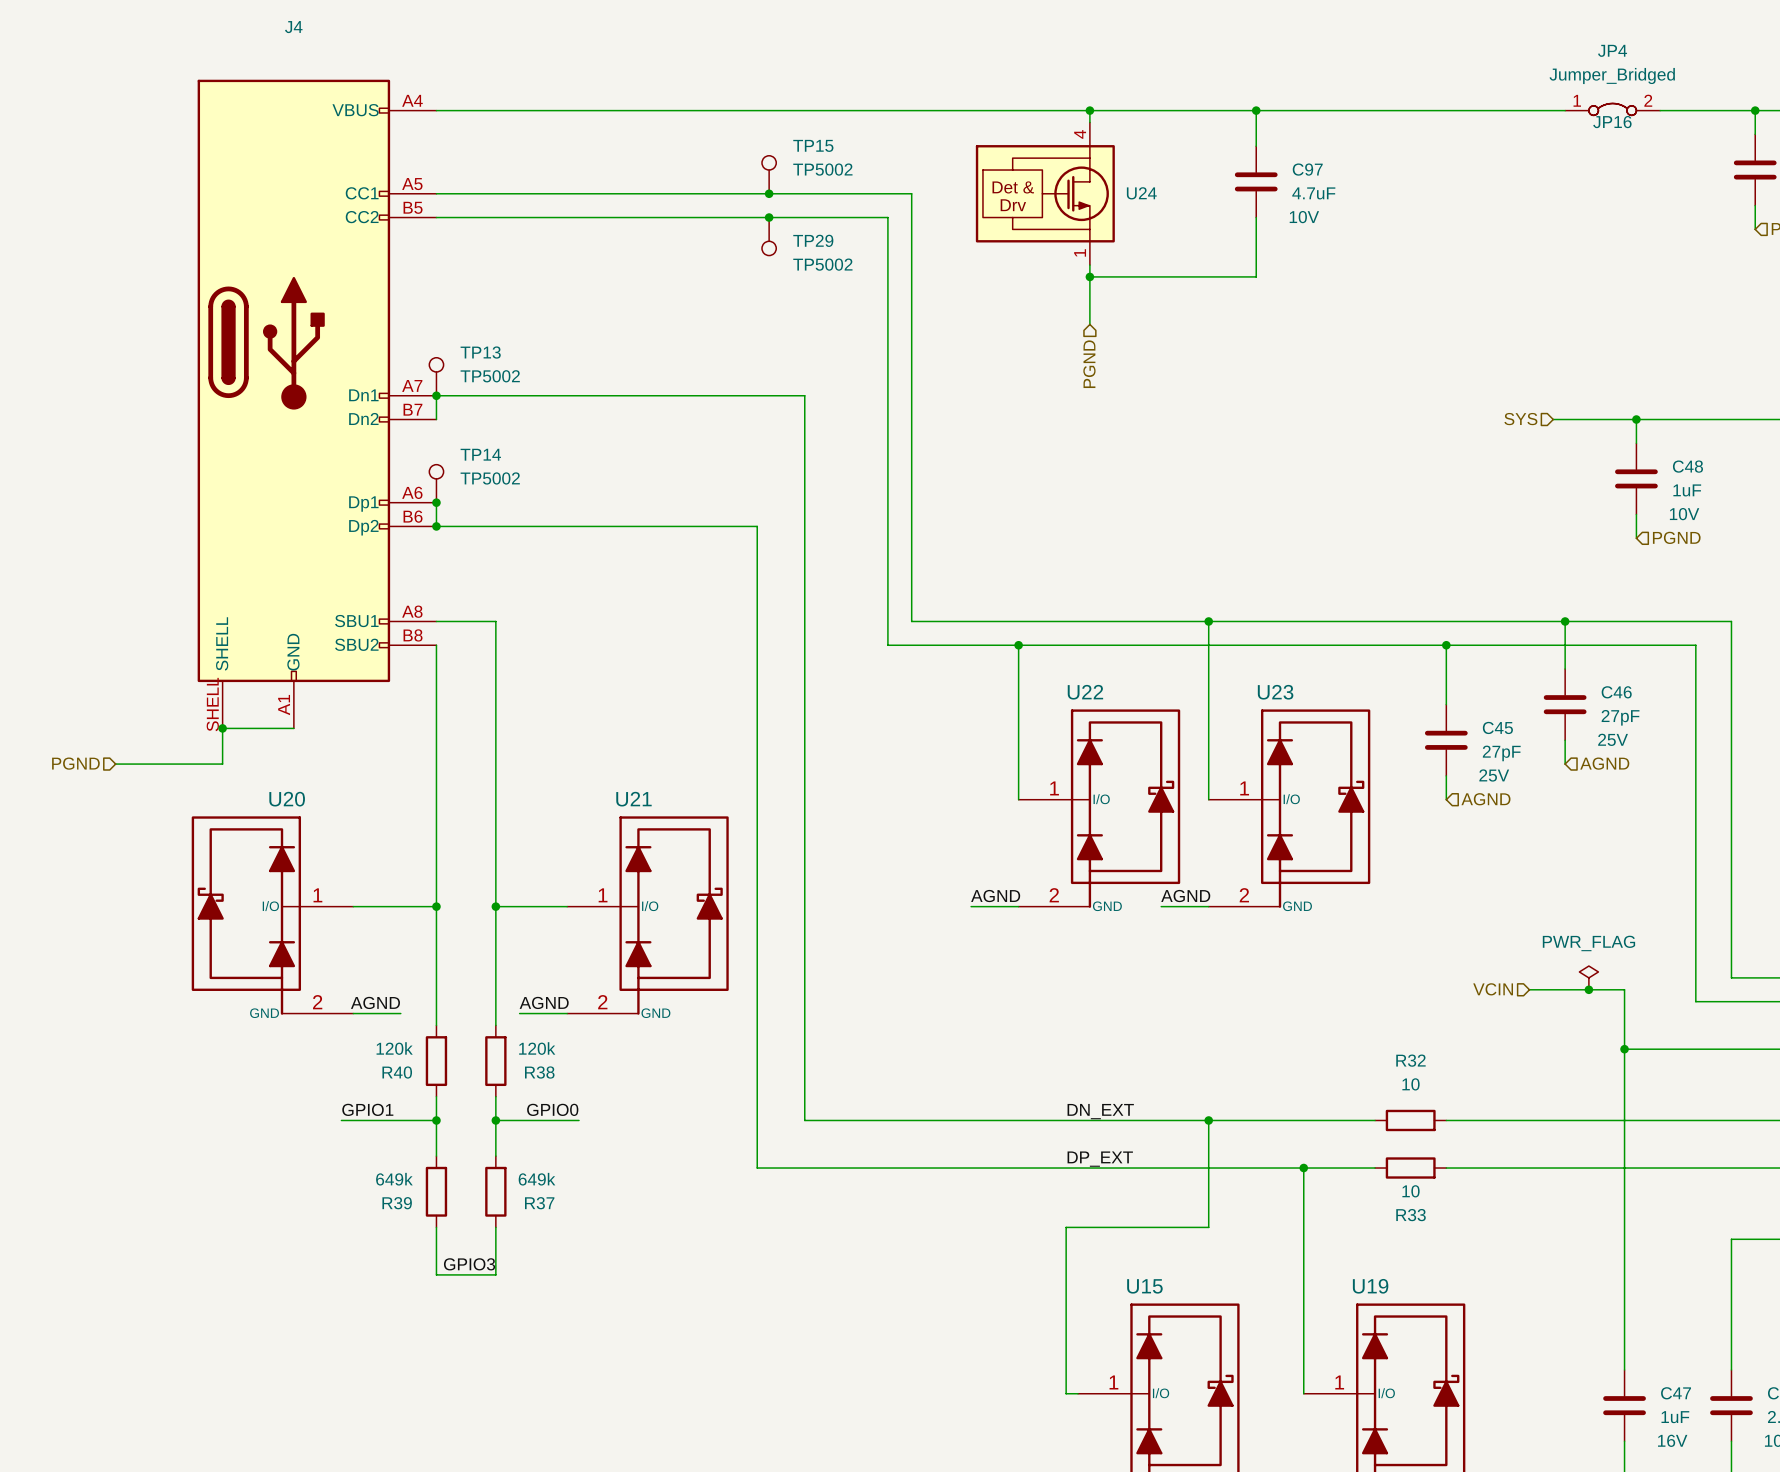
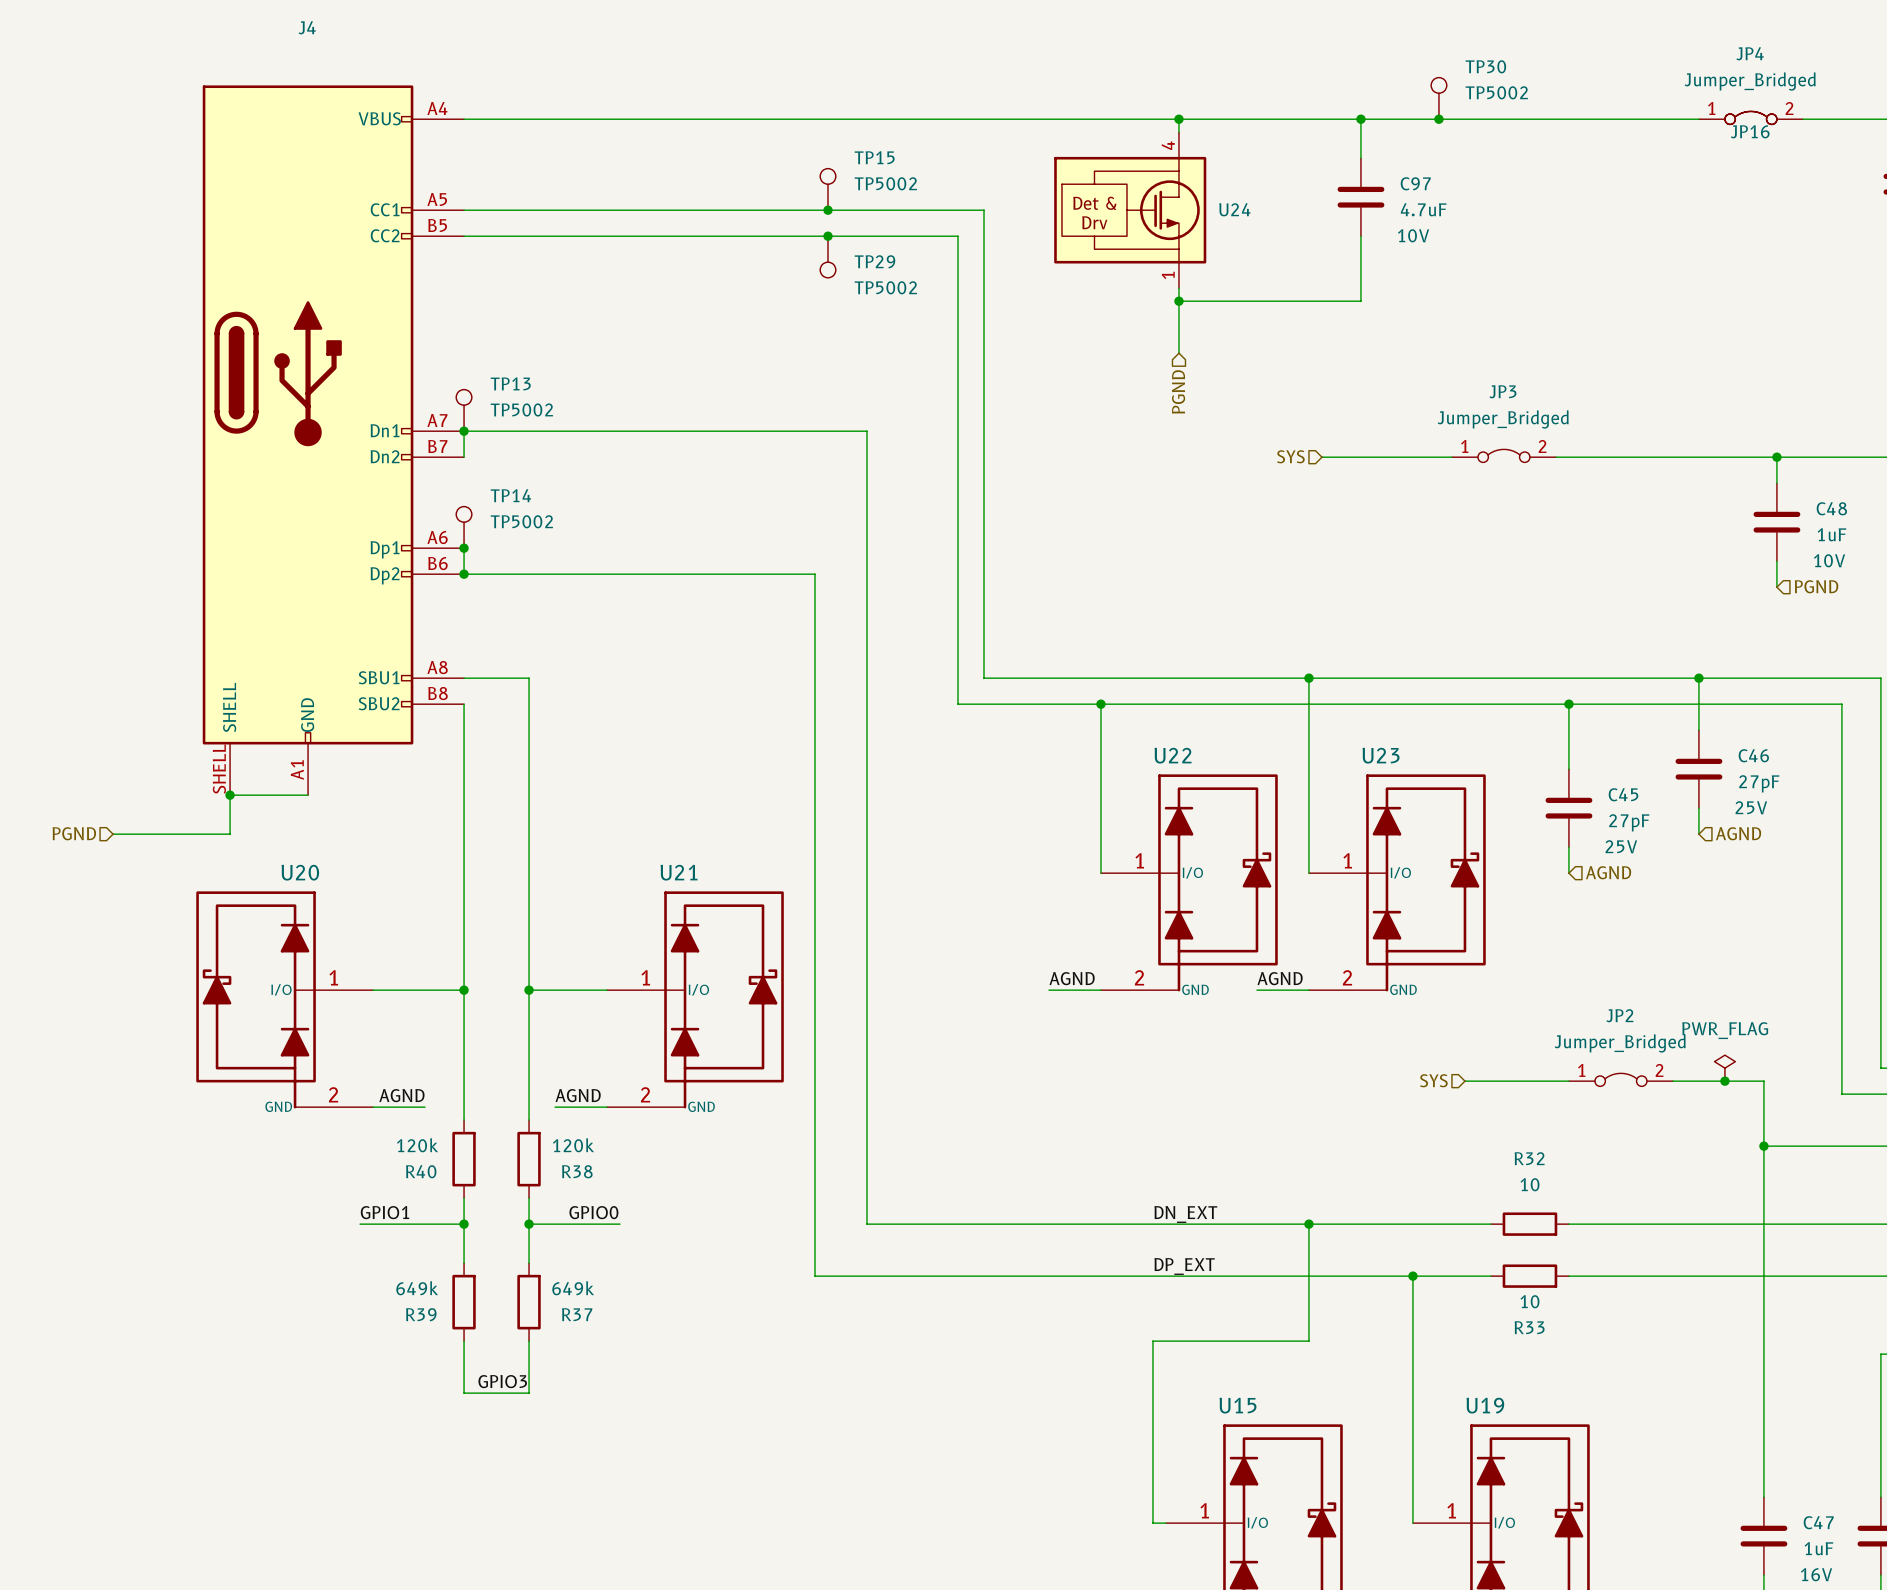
TP30: none -> TP5002 (1438, 98)
junction: none -> (1438, 119)
JP3: none -> Jumper_Bridged (1503, 455)
hierarchical label: none -> SYS (1290, 456)
wire: none -> (1321, 457) (1451, 457)
wire: none -> (1555, 457) (1685, 457)
hierarchical label: SYS (1520, 419) -> none
JP2: none -> Jumper_Bridged (1620, 1079)
hierarchical label: none -> SYS (1433, 1080)
wire: none -> (1464, 1081) (1568, 1081)
hierarchical label: VCIN (1493, 989) -> none

